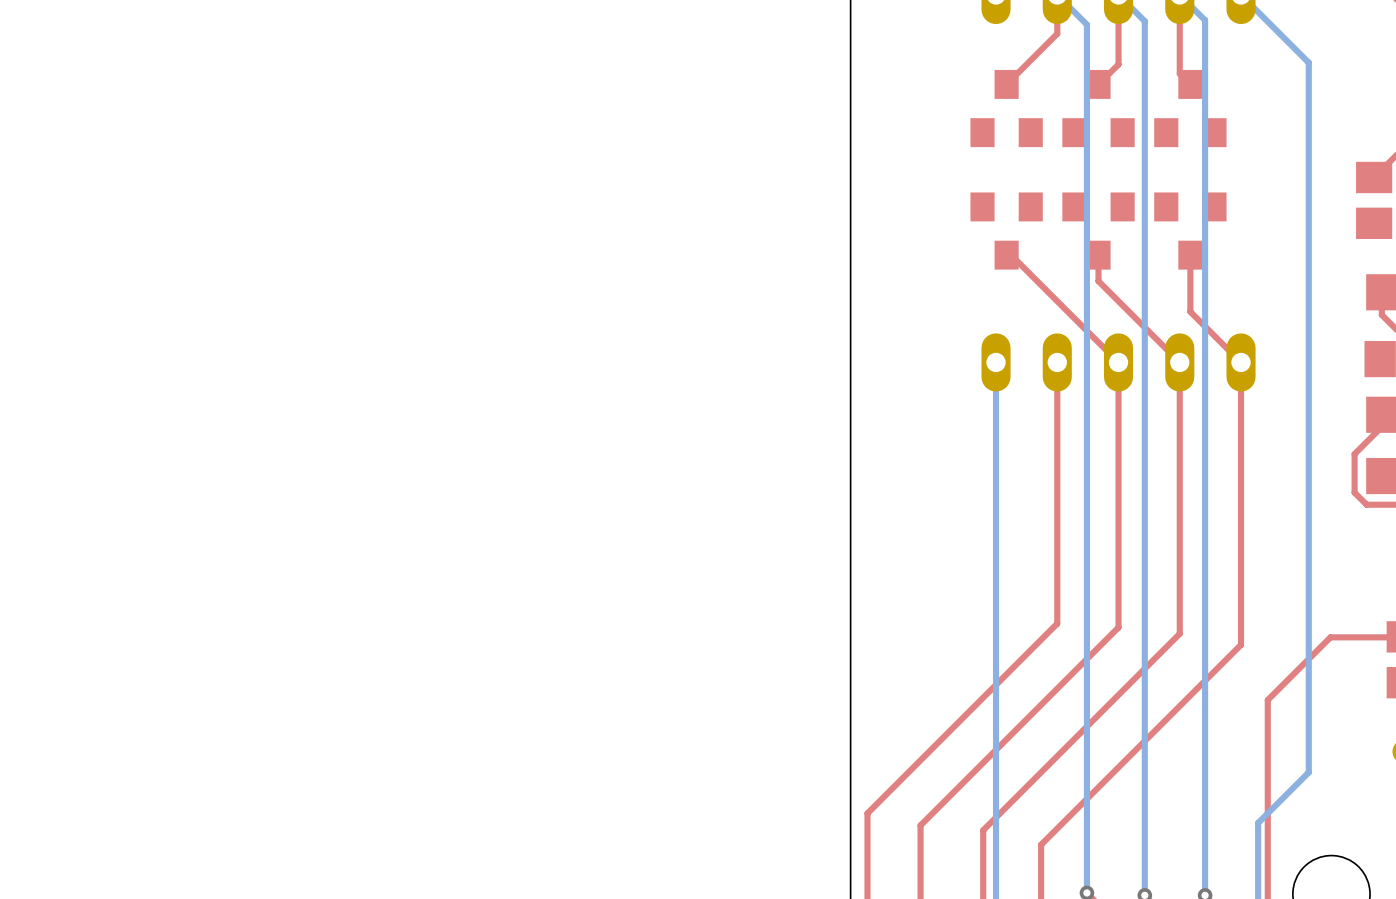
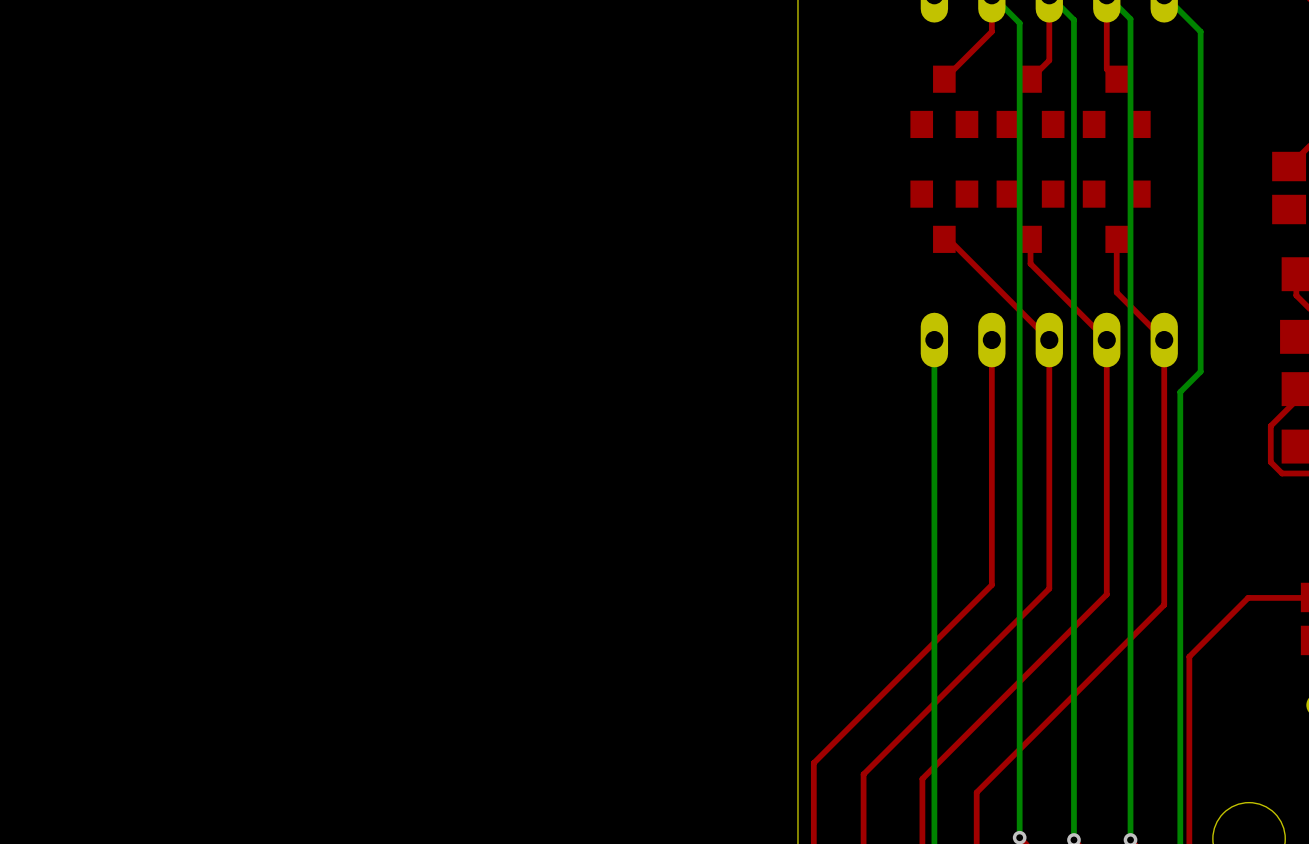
bottom track: (1279, 33) (1308, 62) (1308, 772) (1258, 823) -> (1200, 31) (1200, 371) (1180, 392) (1180, 772)

